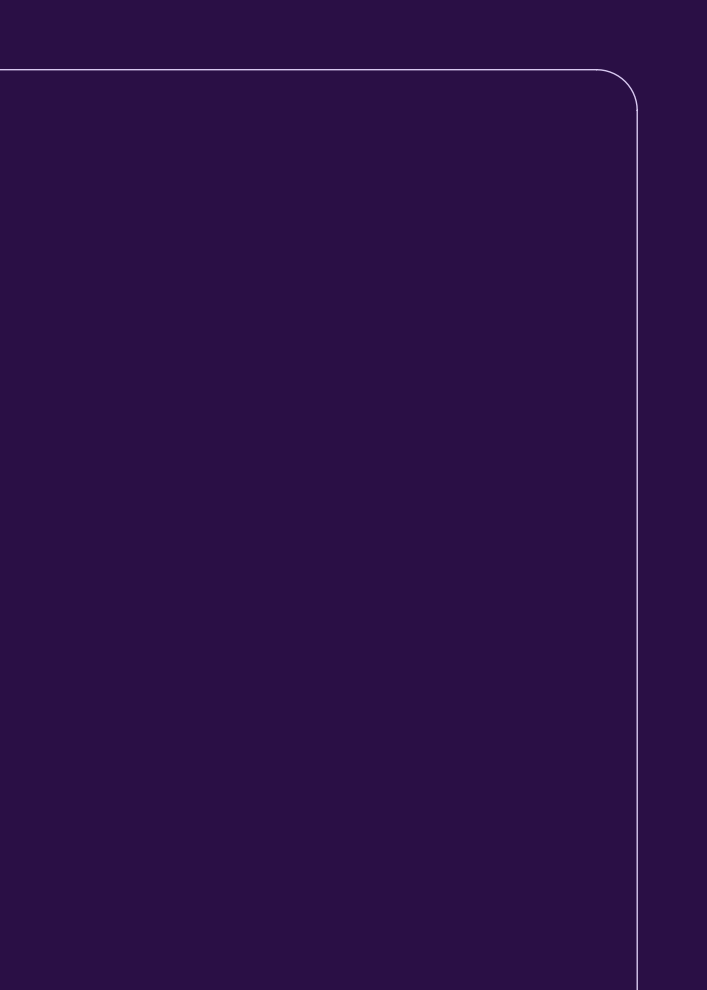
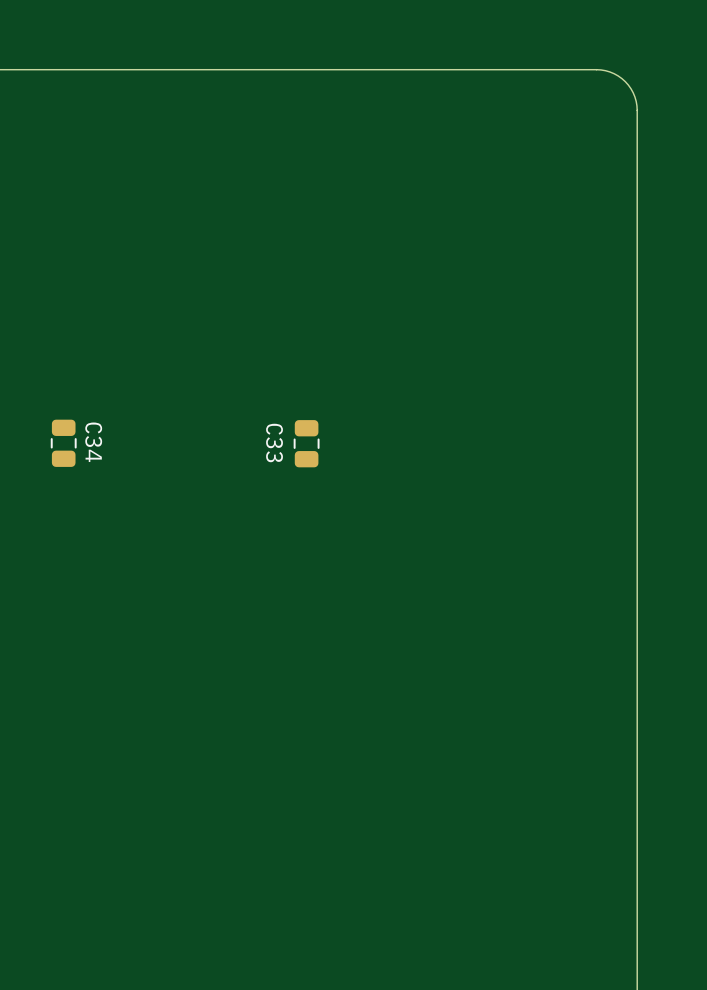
C34: none -> (63, 443)
C33: none -> (306, 443)

